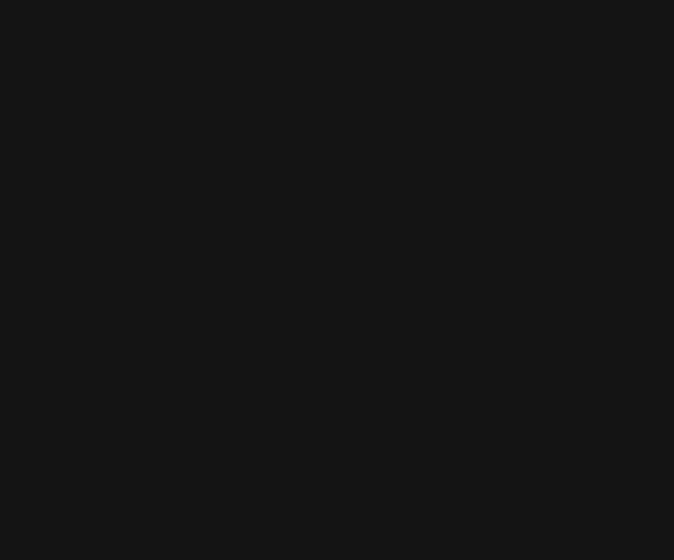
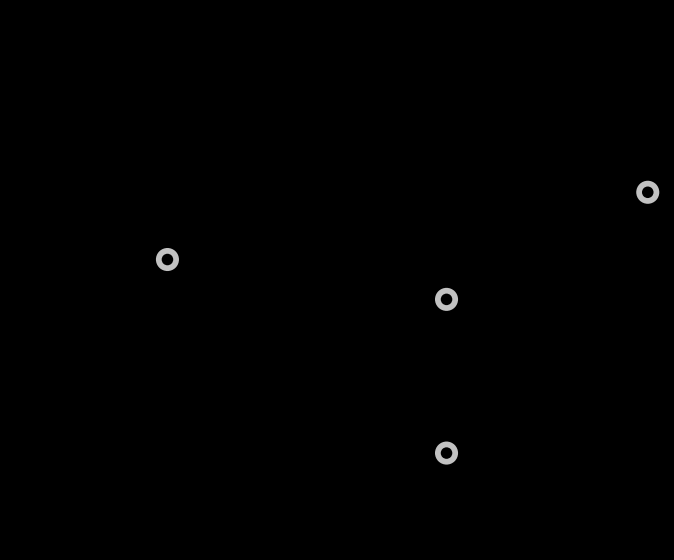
via: none -> (647, 192)
via: none -> (167, 259)
via: none -> (446, 299)
via: none -> (446, 453)

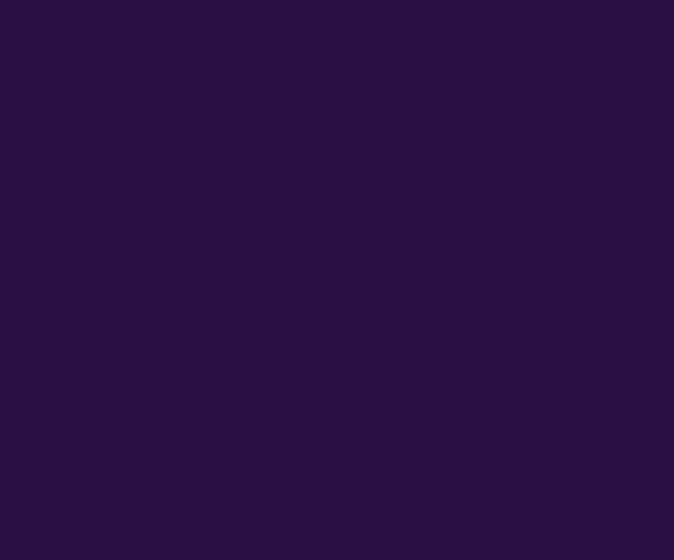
via: (647, 192) -> none
via: (167, 259) -> none
via: (446, 299) -> none
via: (446, 453) -> none

